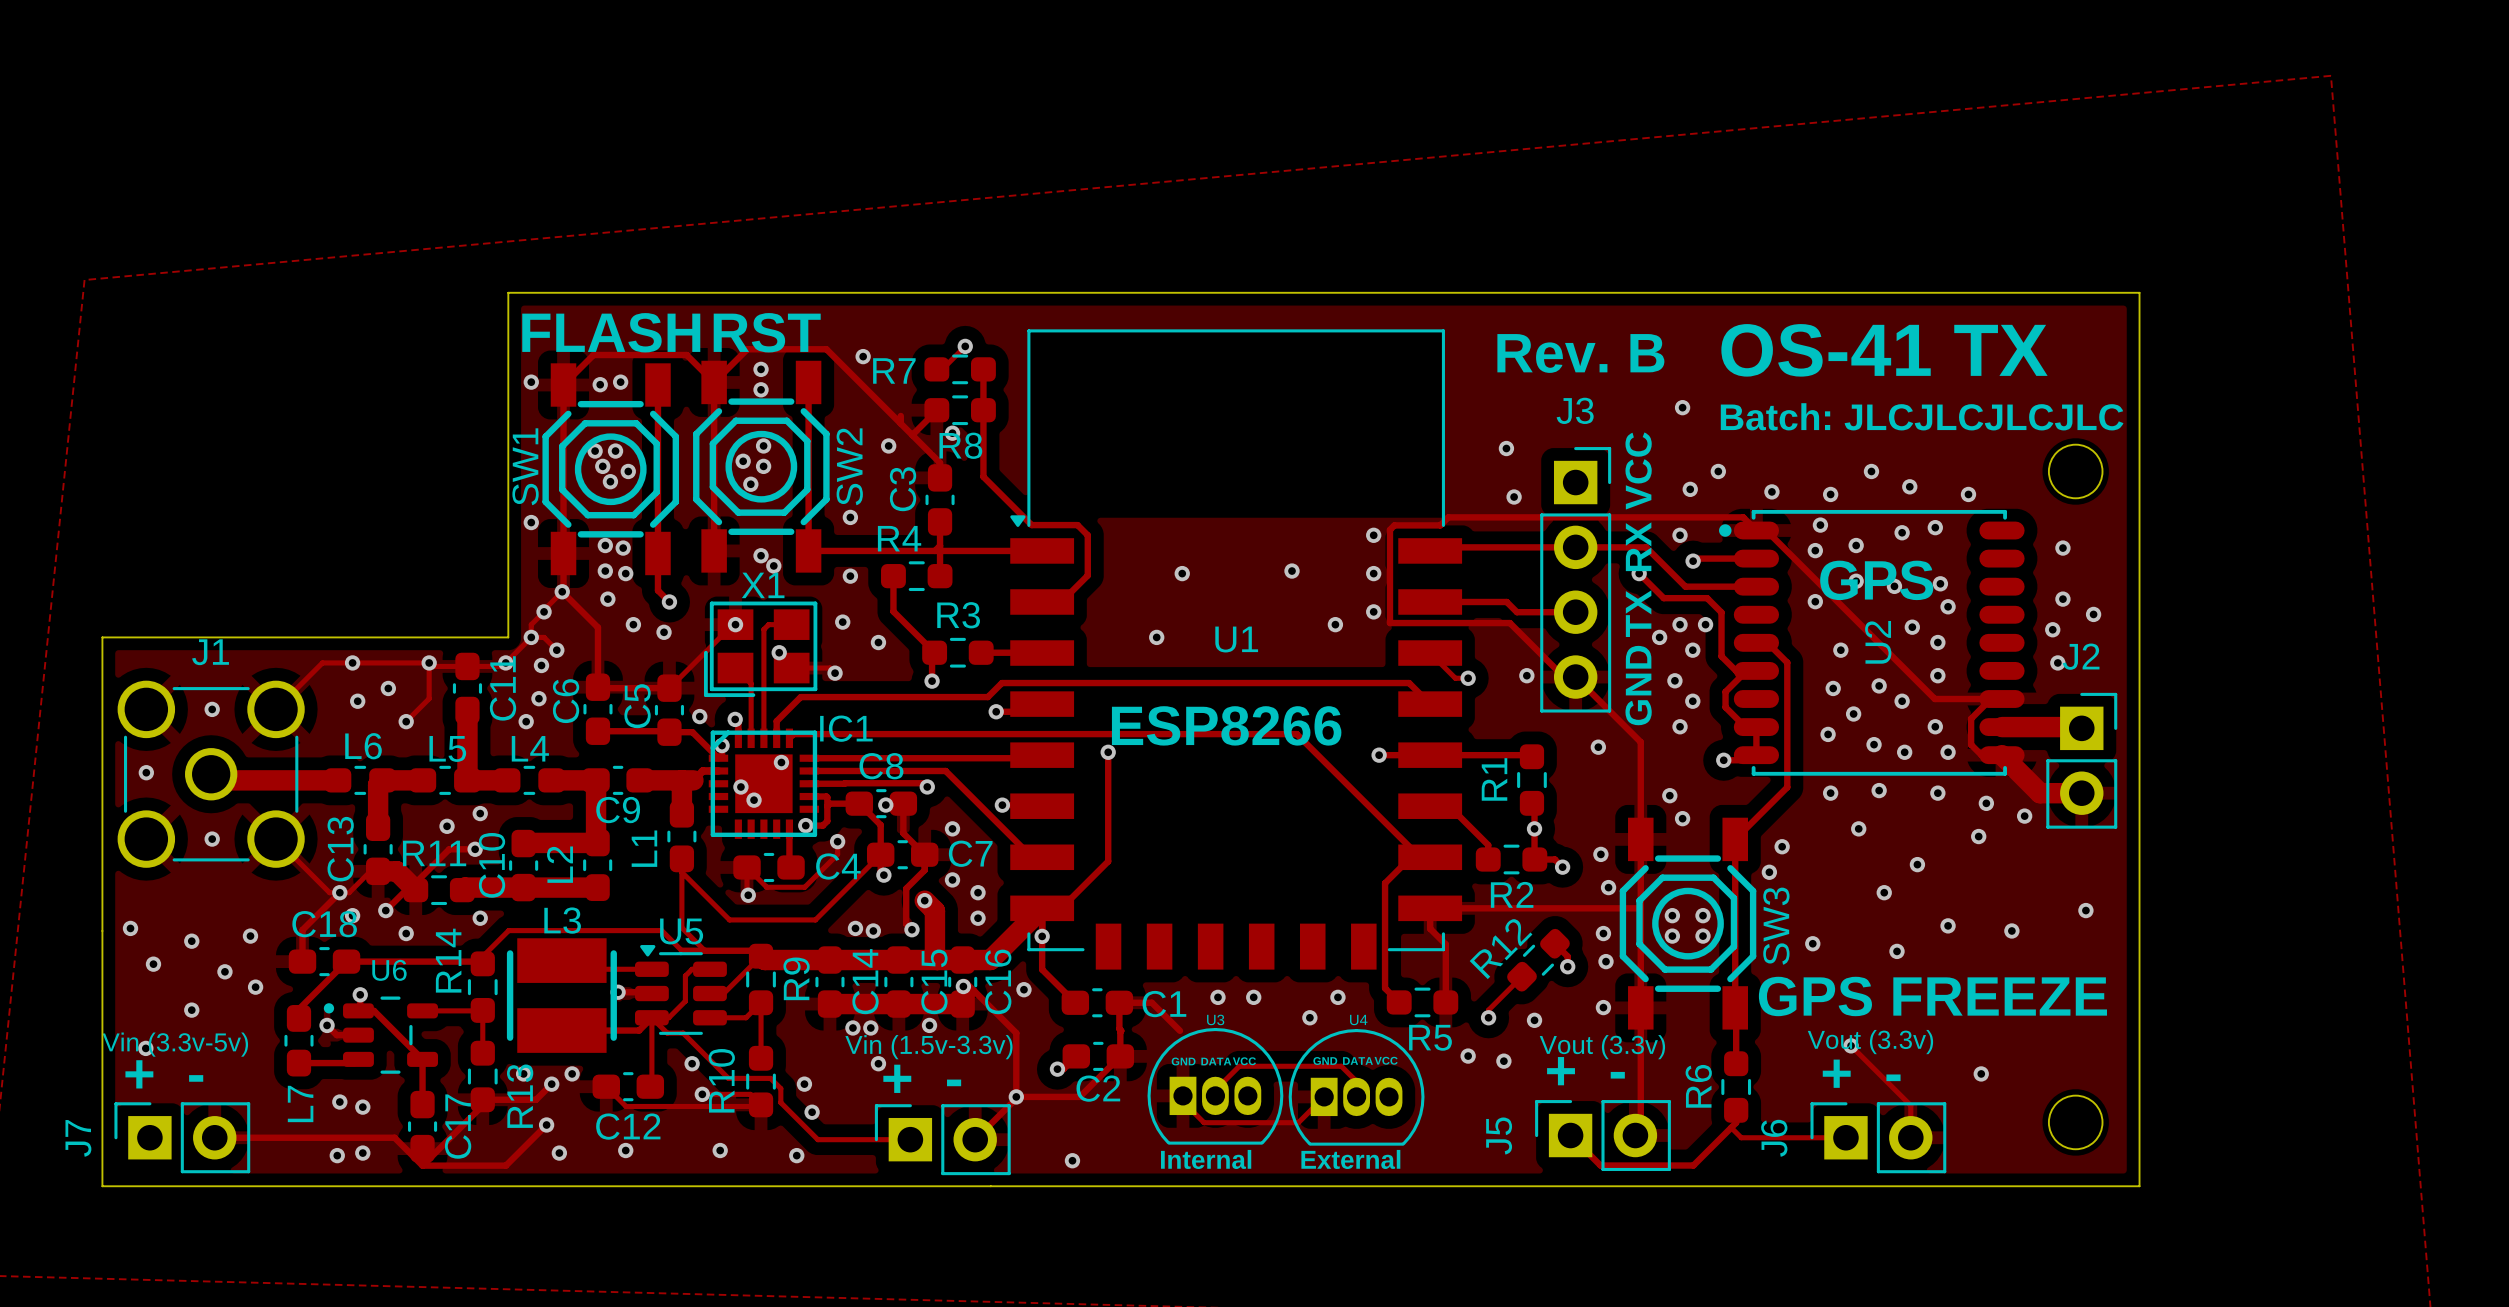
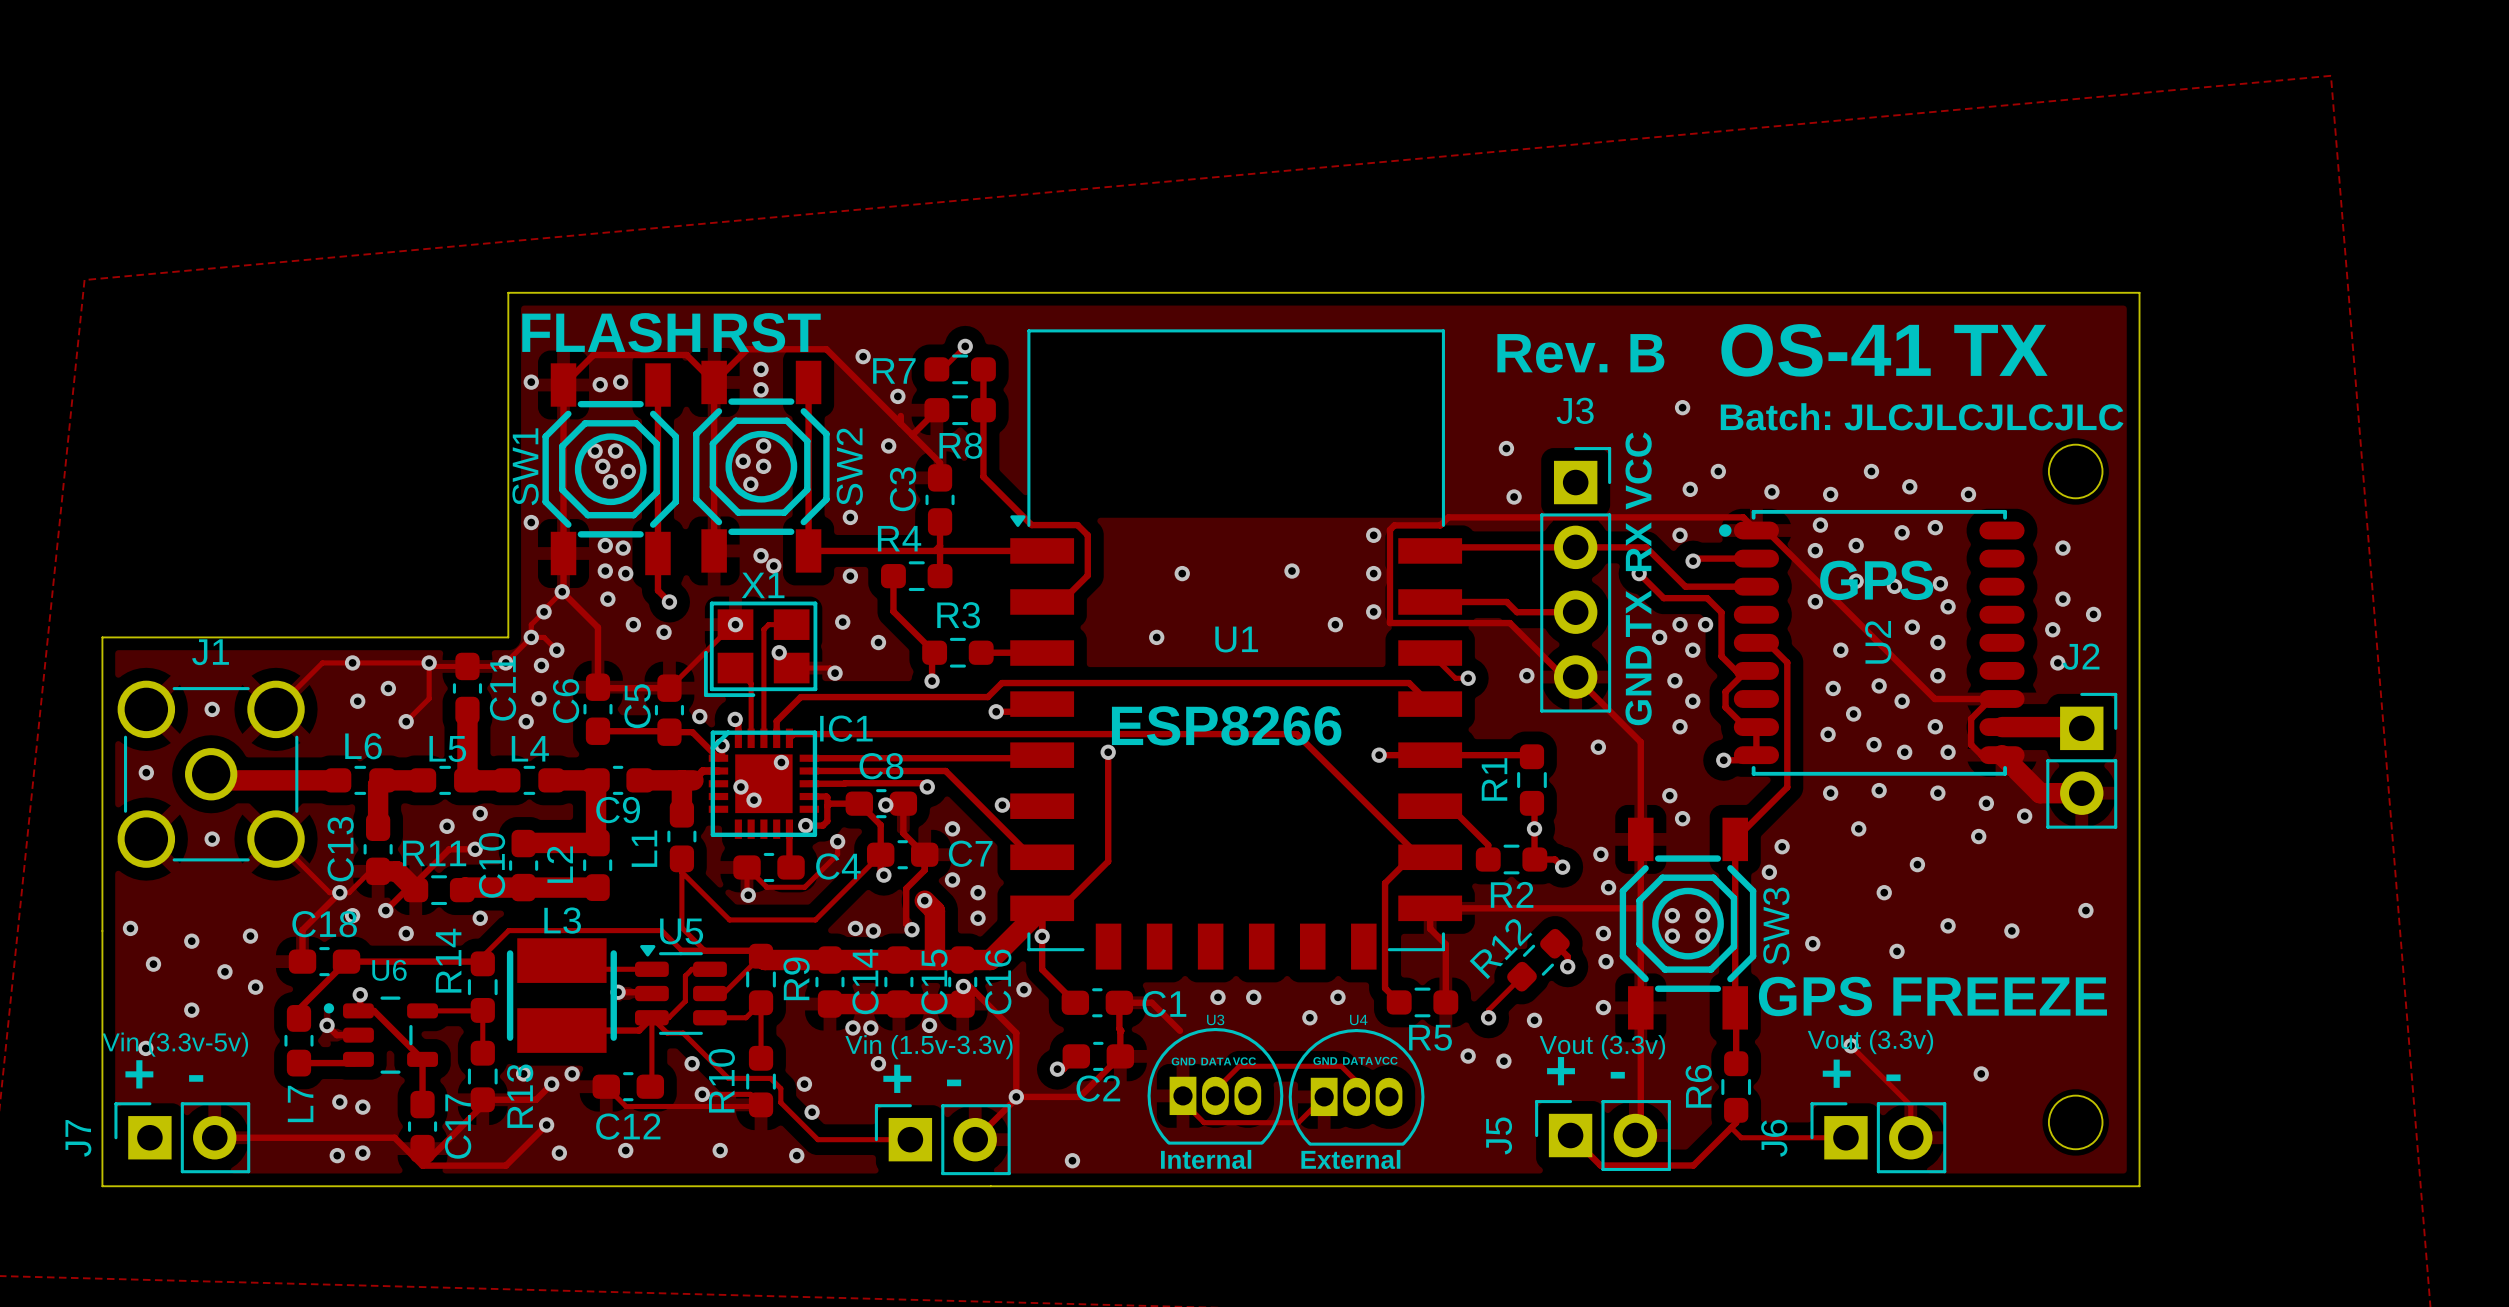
via position: (952, 433) -> (897, 396)

